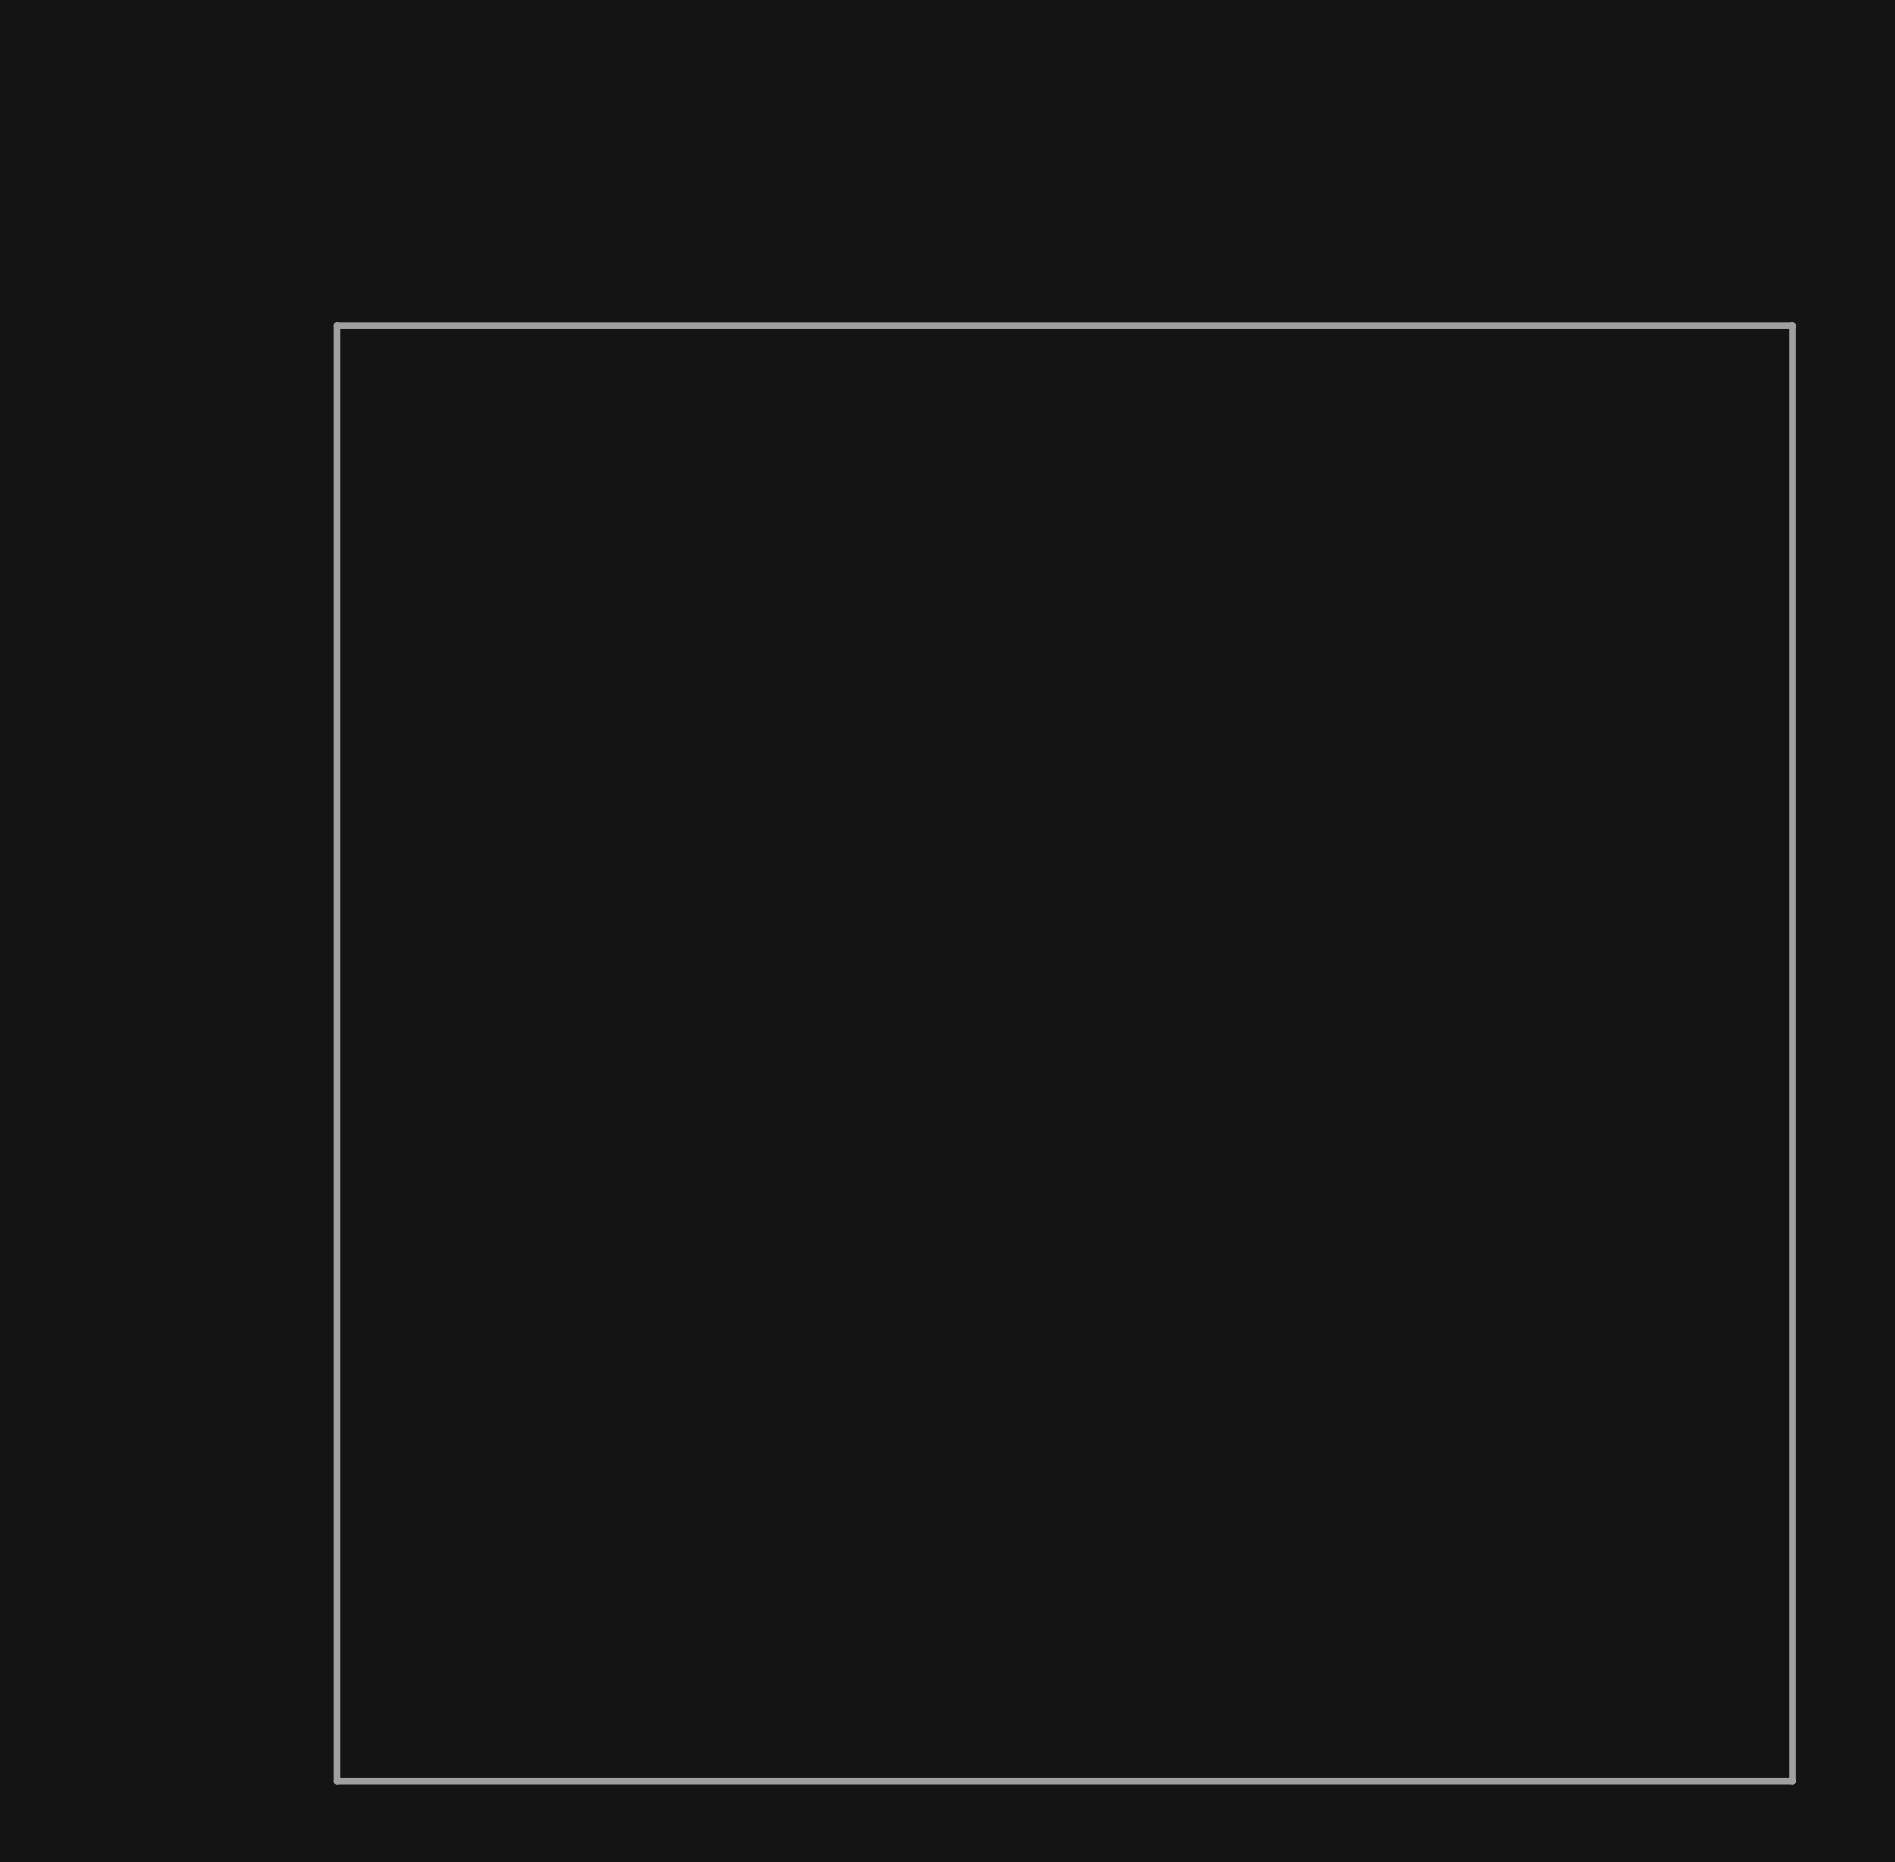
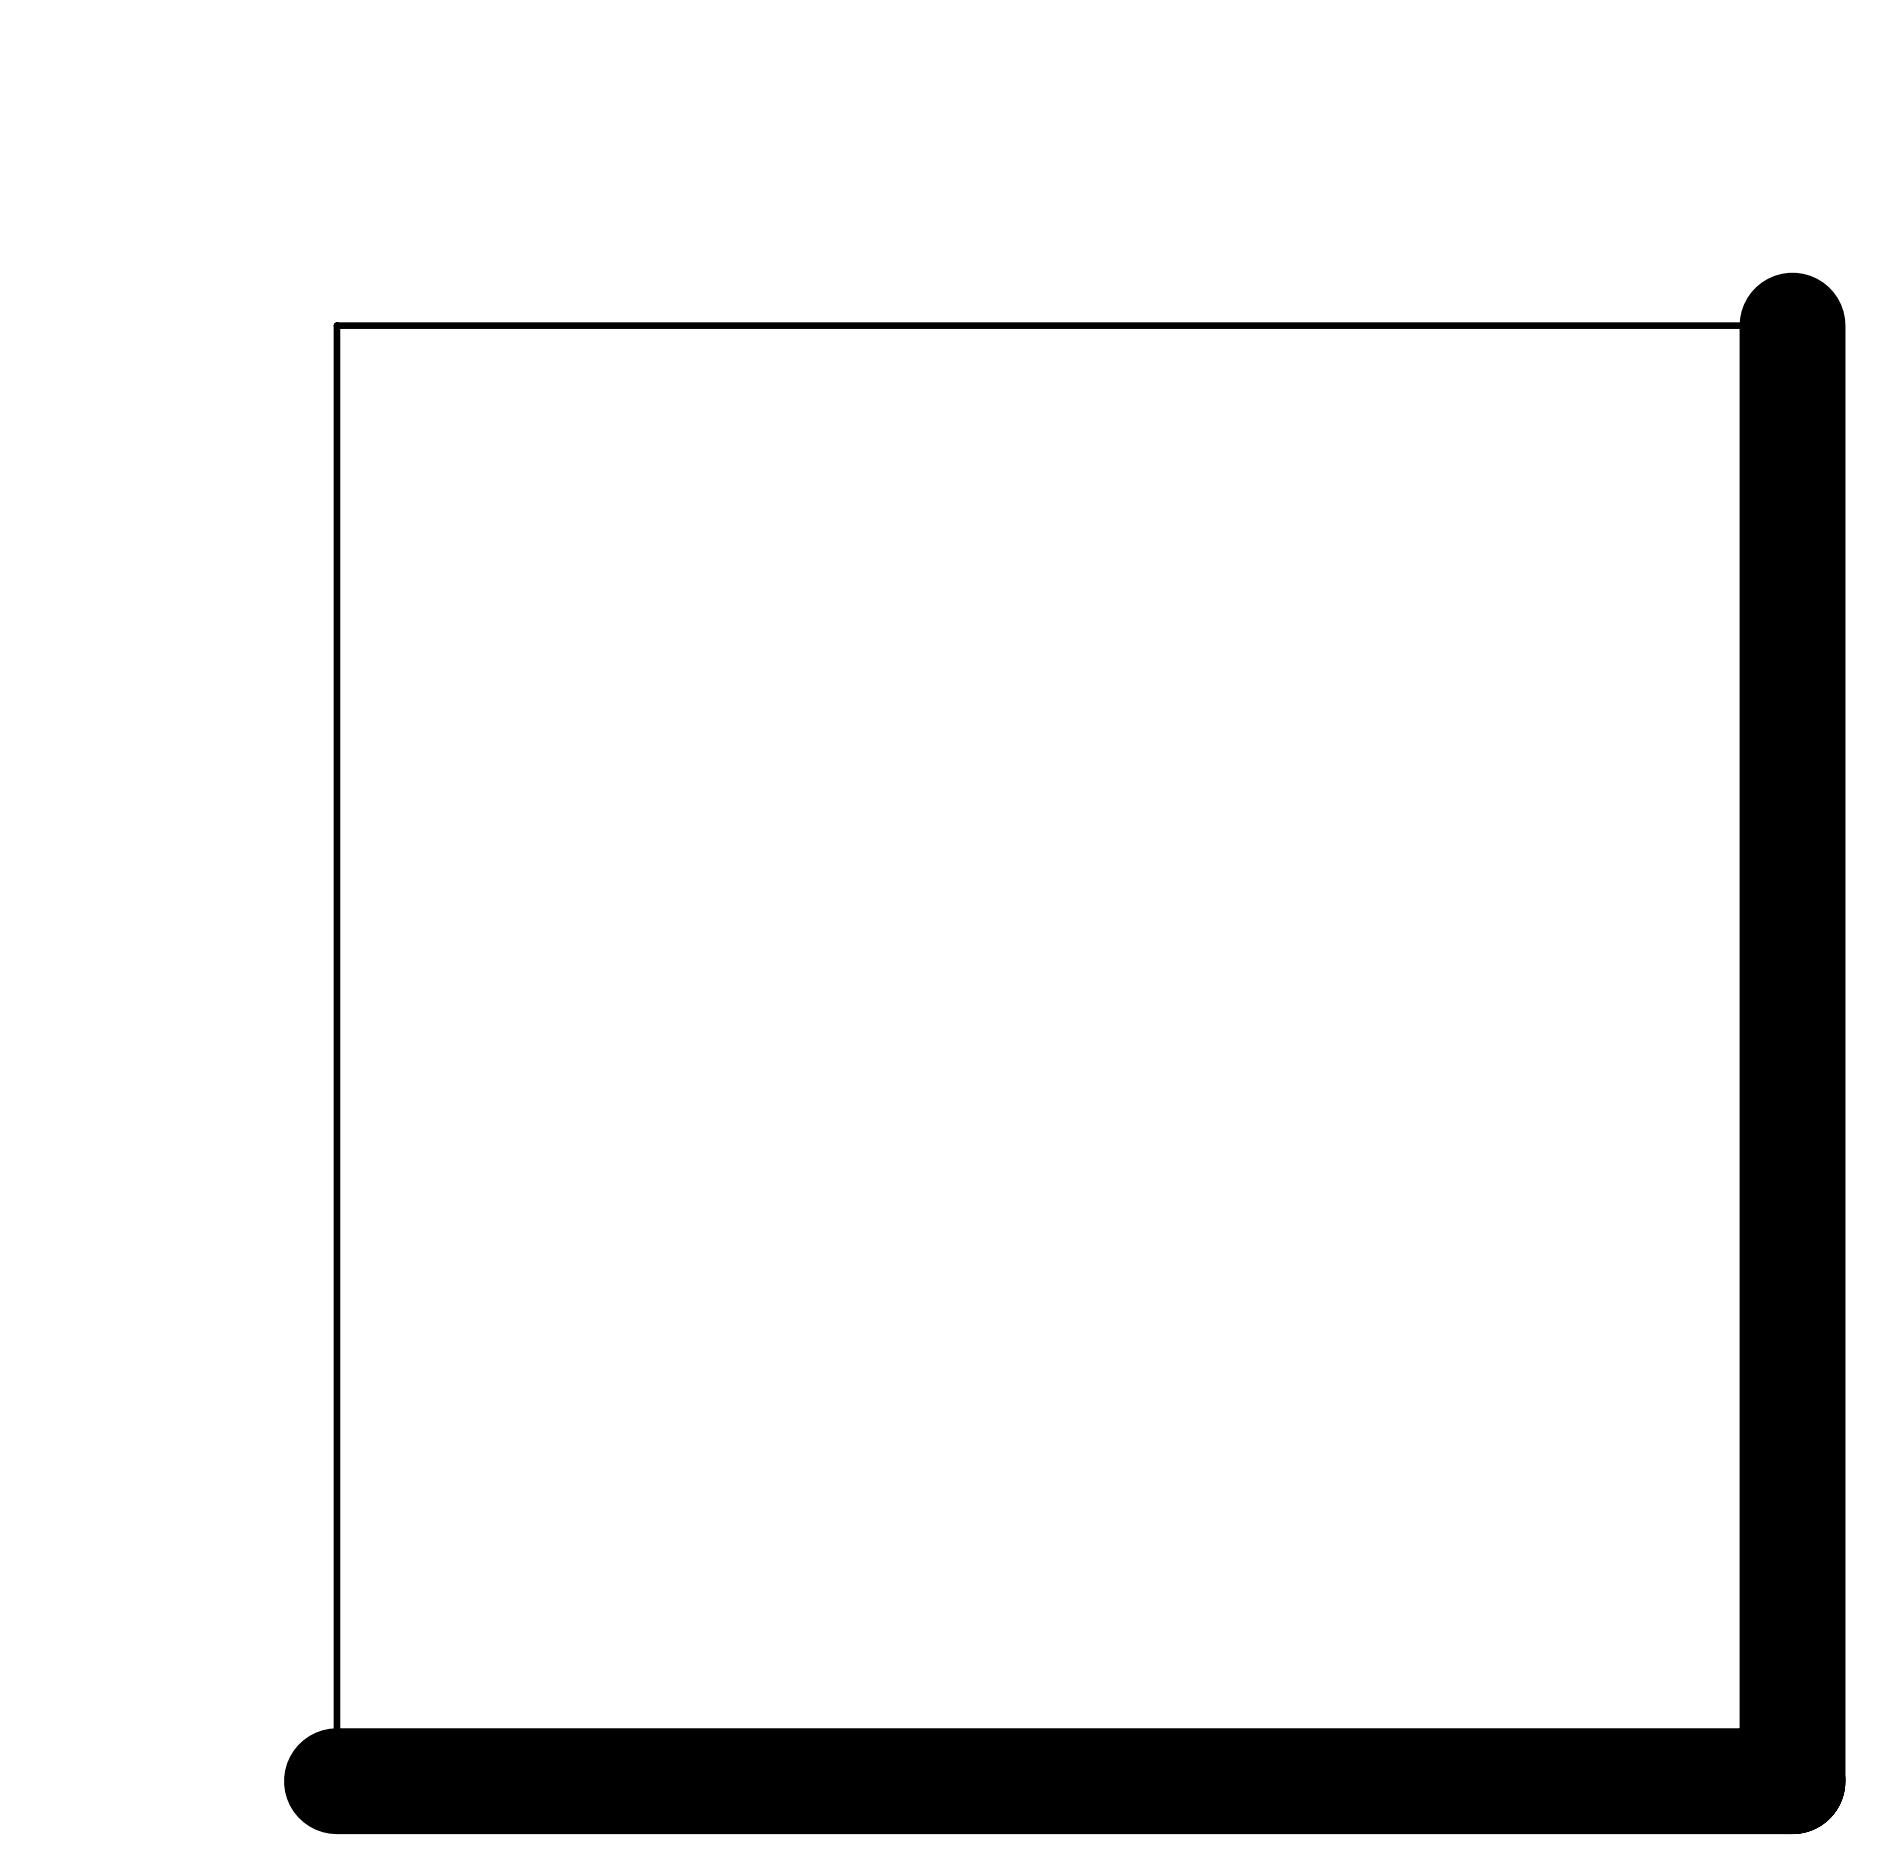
board edge width: thin (1792, 325) (1792, 1781) (336, 1781) -> thick (1792, 325) (1792, 1781) (336, 1781)

